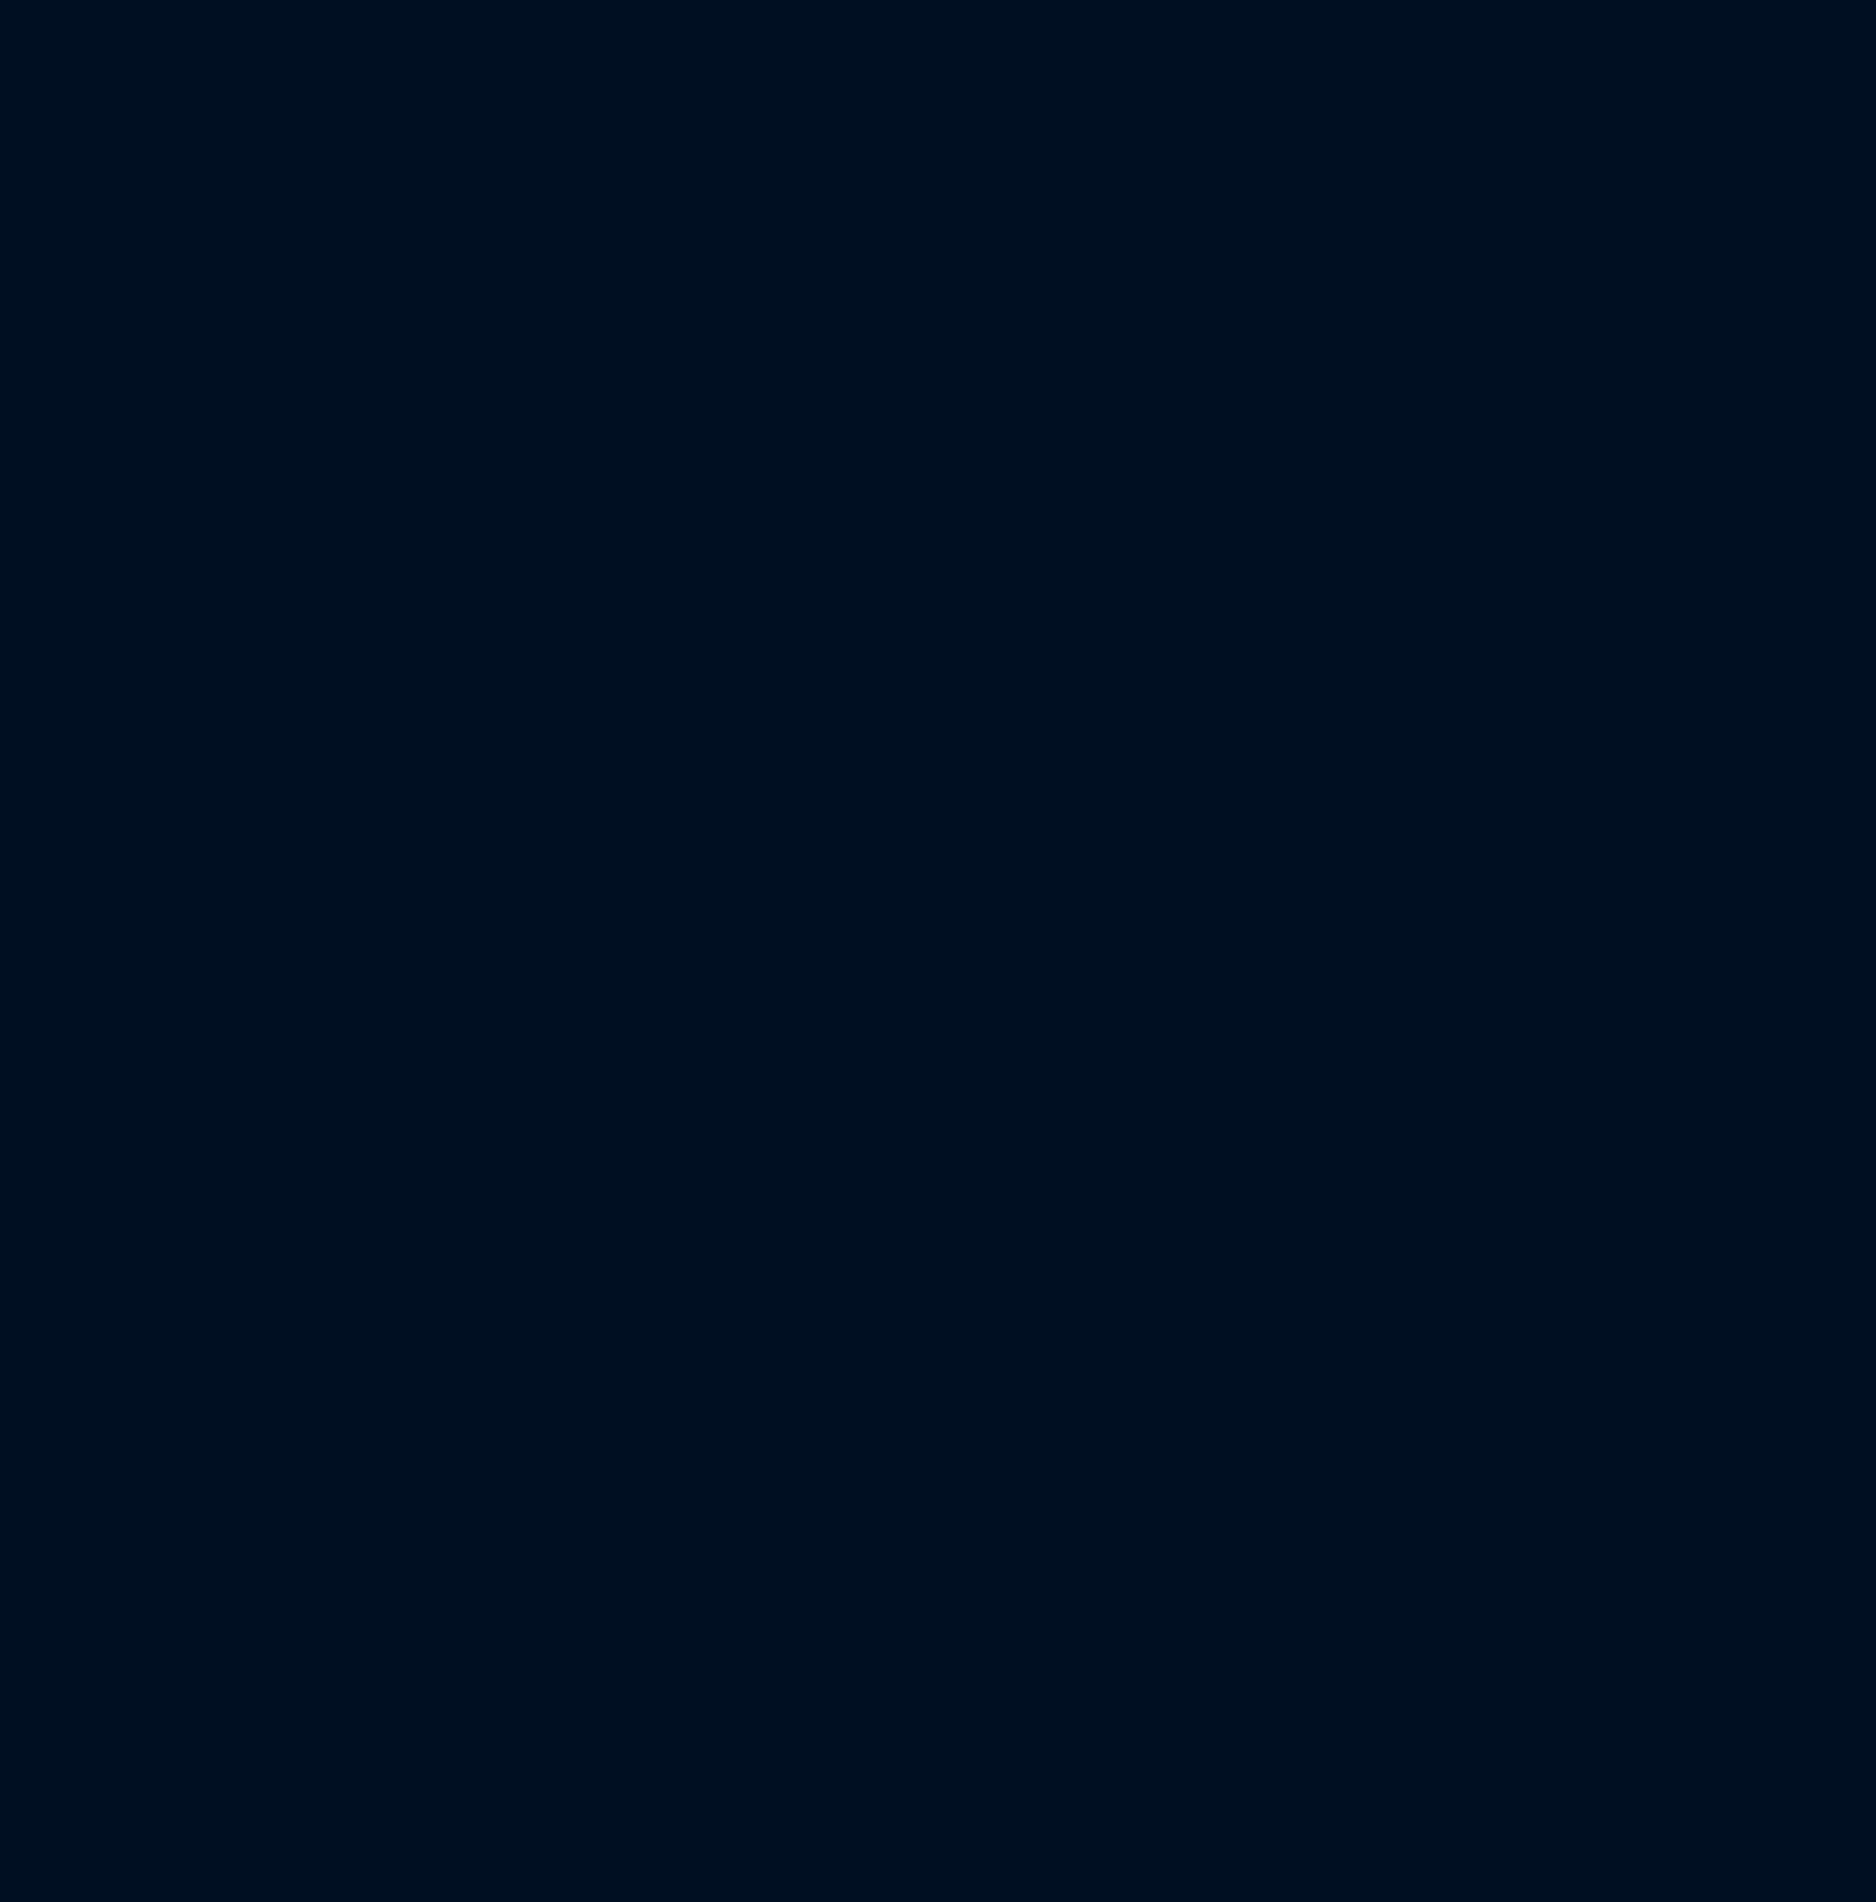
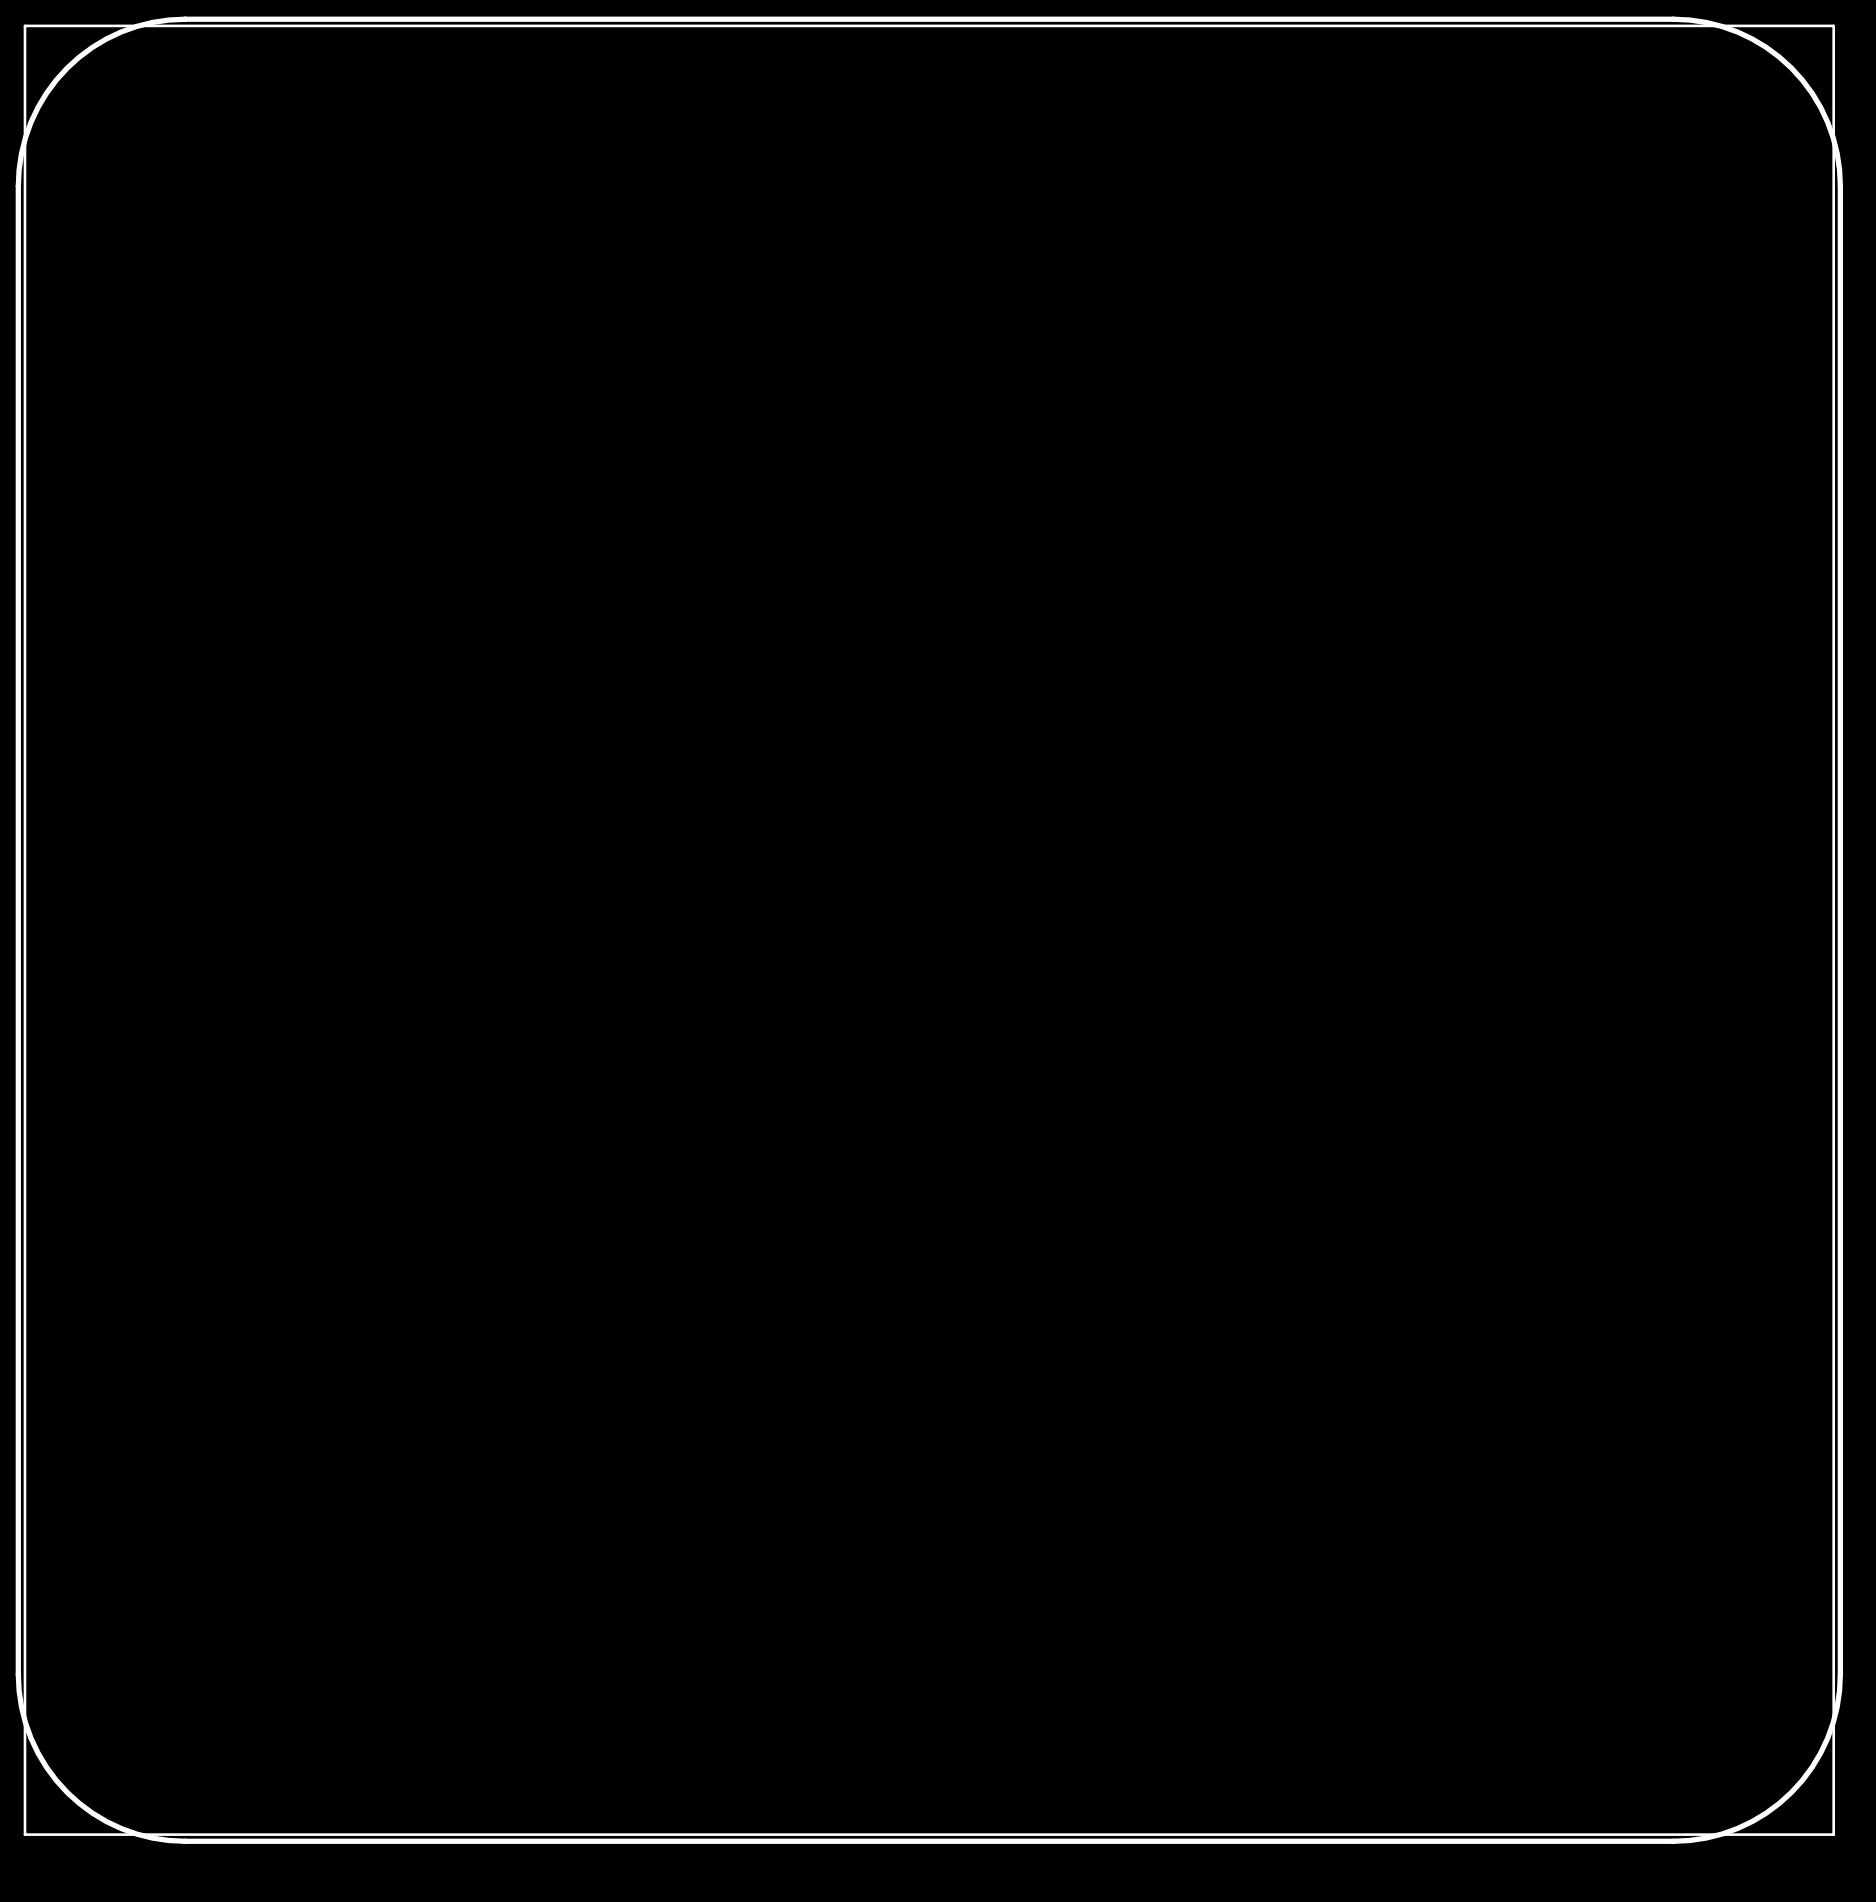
board edge: none -> (185, 19) (1673, 19) (1706, 22) (1737, 31) (1752, 38) (1779, 57) (1802, 80) (1820, 107) (1833, 137) (1839, 169) (1840, 186) (1840, 1674) (1839, 1690) (1833, 1722) (1820, 1753) (1802, 1780) (1779, 1803) (1752, 1821) (1721, 1834) (1689, 1840) (1673, 1841) (185, 1841) (152, 1838) (121, 1828) (92, 1813) (79, 1803) (56, 1780) (46, 1767) (31, 1738) (21, 1706) (18, 1674) (19, 169) (25, 137) (38, 107) (46, 93) (67, 68) (92, 47) (121, 31) (152, 22) (185, 19)
board edge: none -> (24, 25) (1833, 25) (1833, 1834) (24, 1834) (24, 25)

